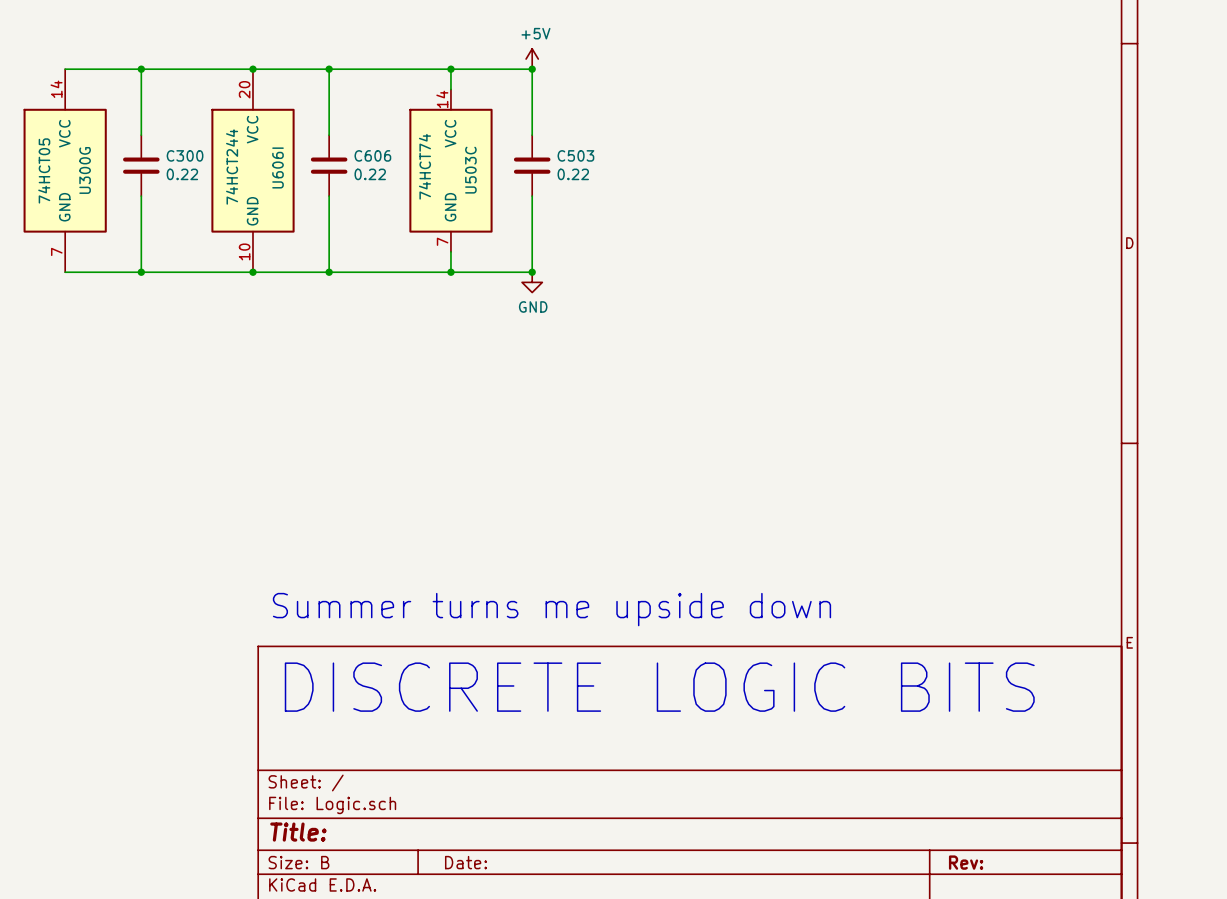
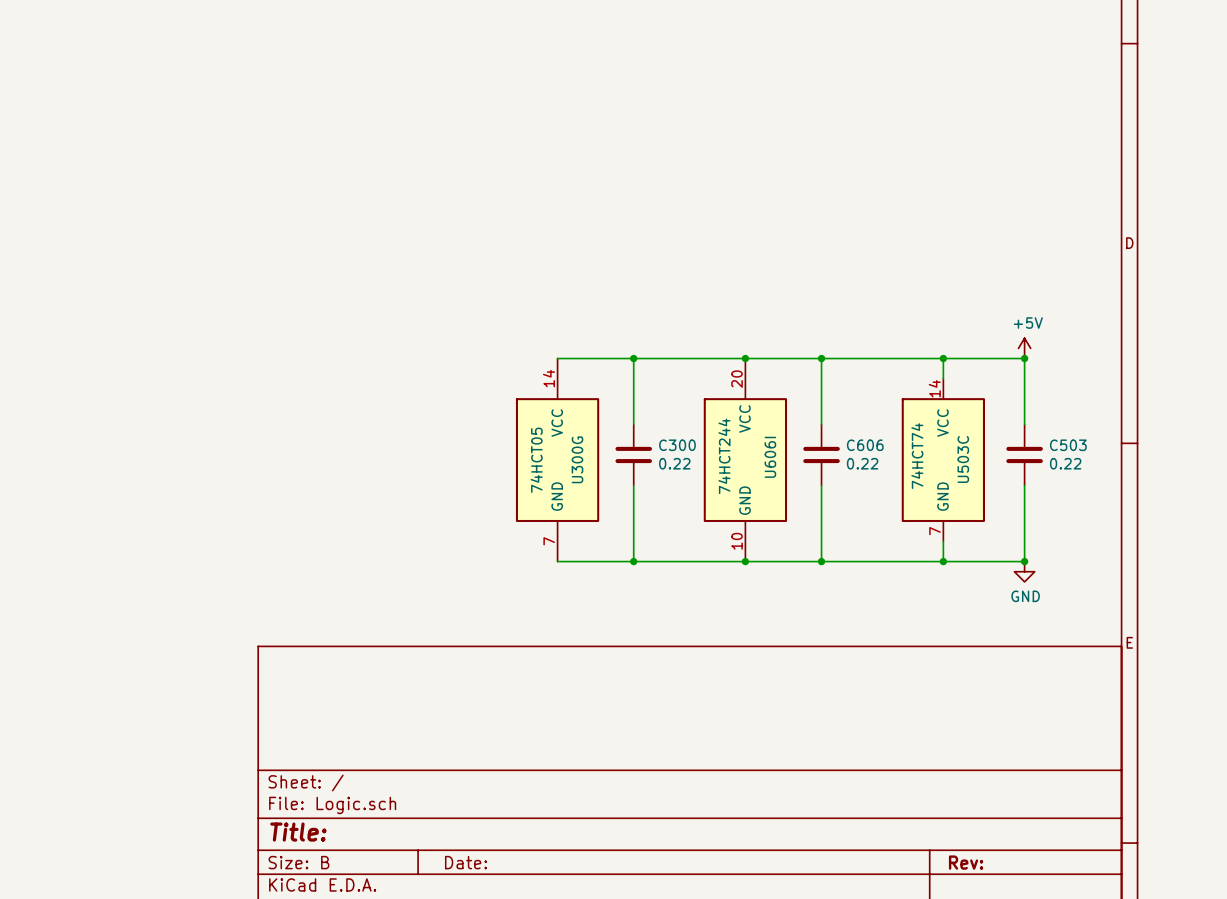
power symbol: +5V (532, 59) -> none
wire: (65, 69) (532, 69) (532, 135) -> none
wire: (141, 69) (141, 135) -> none
junction: (141, 69) -> none
junction: (252, 69) -> none
wire: (329, 69) (329, 135) -> none
junction: (329, 69) -> none
wire: (450, 69) (450, 89) -> none
junction: (450, 69) -> none
junction: (532, 69) -> none
C300 position: (141, 165) -> (633, 454)
C606 position: (329, 165) -> (821, 454)
C503 position: (532, 165) -> (1024, 454)
U300G position: (65, 170) -> (557, 460)
U606I position: (252, 170) -> (745, 460)
U503C position: (450, 170) -> (943, 460)
wire: (141, 196) (141, 272) -> none
wire: (329, 196) (329, 272) -> none
wire: (532, 196) (532, 272) (65, 272) -> none
wire: (450, 251) (450, 272) -> none
junction: (141, 272) -> none
junction: (252, 272) -> none
junction: (329, 272) -> none
junction: (450, 272) -> none
junction: (532, 272) -> none
power symbol: GND (532, 282) -> none
power symbol: none -> +5V (1024, 348)
wire: none -> (557, 358) (1024, 358) (1024, 424)
wire: none -> (633, 358) (633, 424)
junction: none -> (633, 358)
junction: none -> (745, 358)
wire: none -> (821, 358) (821, 424)
junction: none -> (821, 358)
wire: none -> (943, 358) (943, 378)
junction: none -> (943, 358)
junction: none -> (1024, 358)
wire: none -> (633, 485) (633, 561)
wire: none -> (821, 485) (821, 561)
wire: none -> (1024, 485) (1024, 561) (557, 561)
wire: none -> (943, 541) (943, 561)
junction: none -> (633, 561)
junction: none -> (745, 561)
junction: none -> (821, 561)
junction: none -> (943, 561)
junction: none -> (1024, 561)
power symbol: none -> GND (1024, 571)
text: Summer turns me upside down (551, 609) -> none
text: DISCRETE LOGIC BITS (659, 687) -> none

